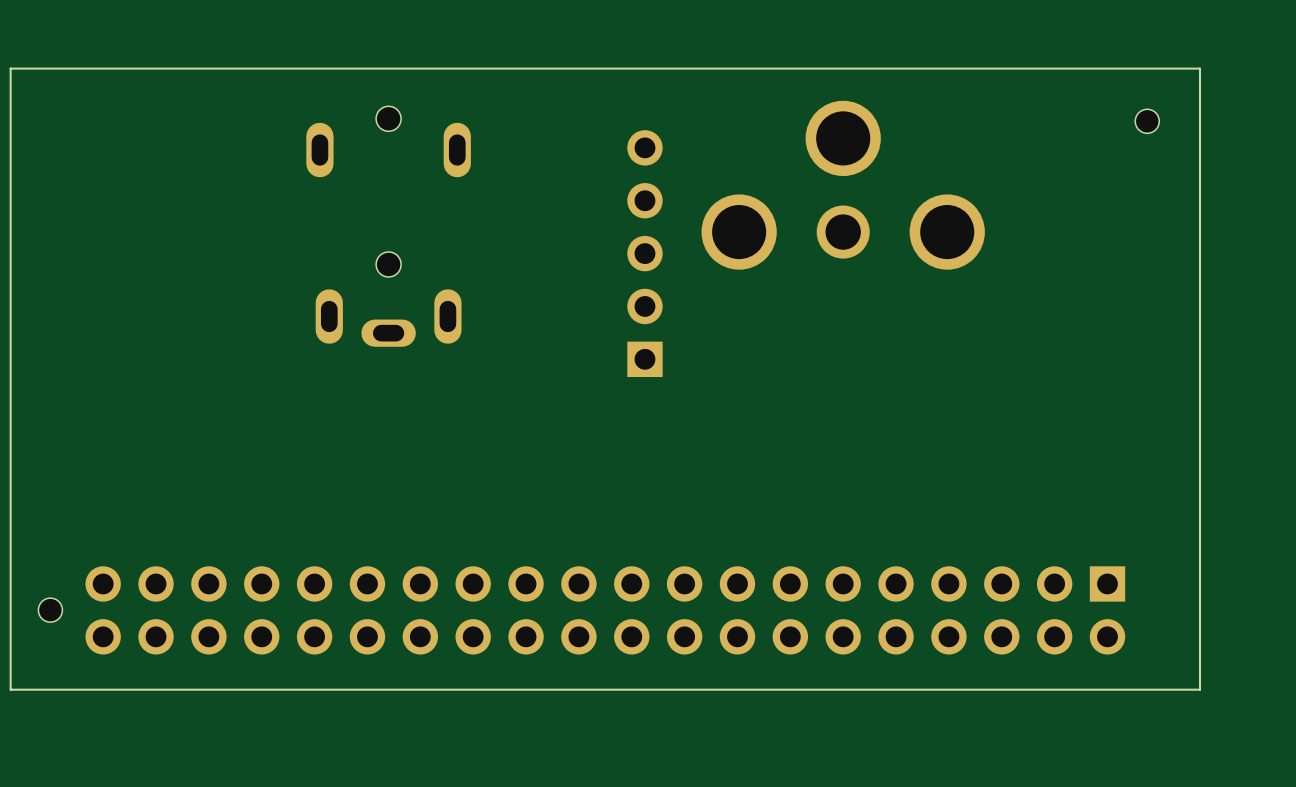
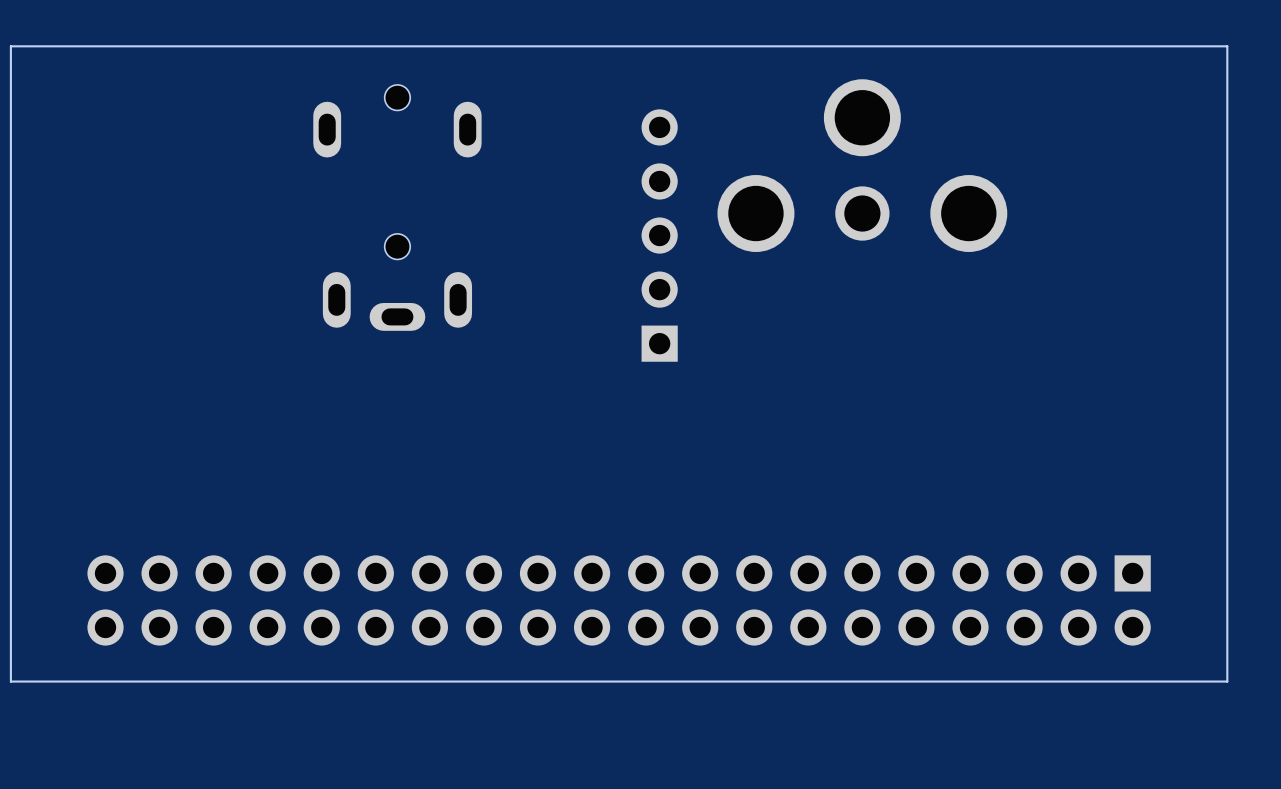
part: (1147, 121) -> none
part: (50, 610) -> none

